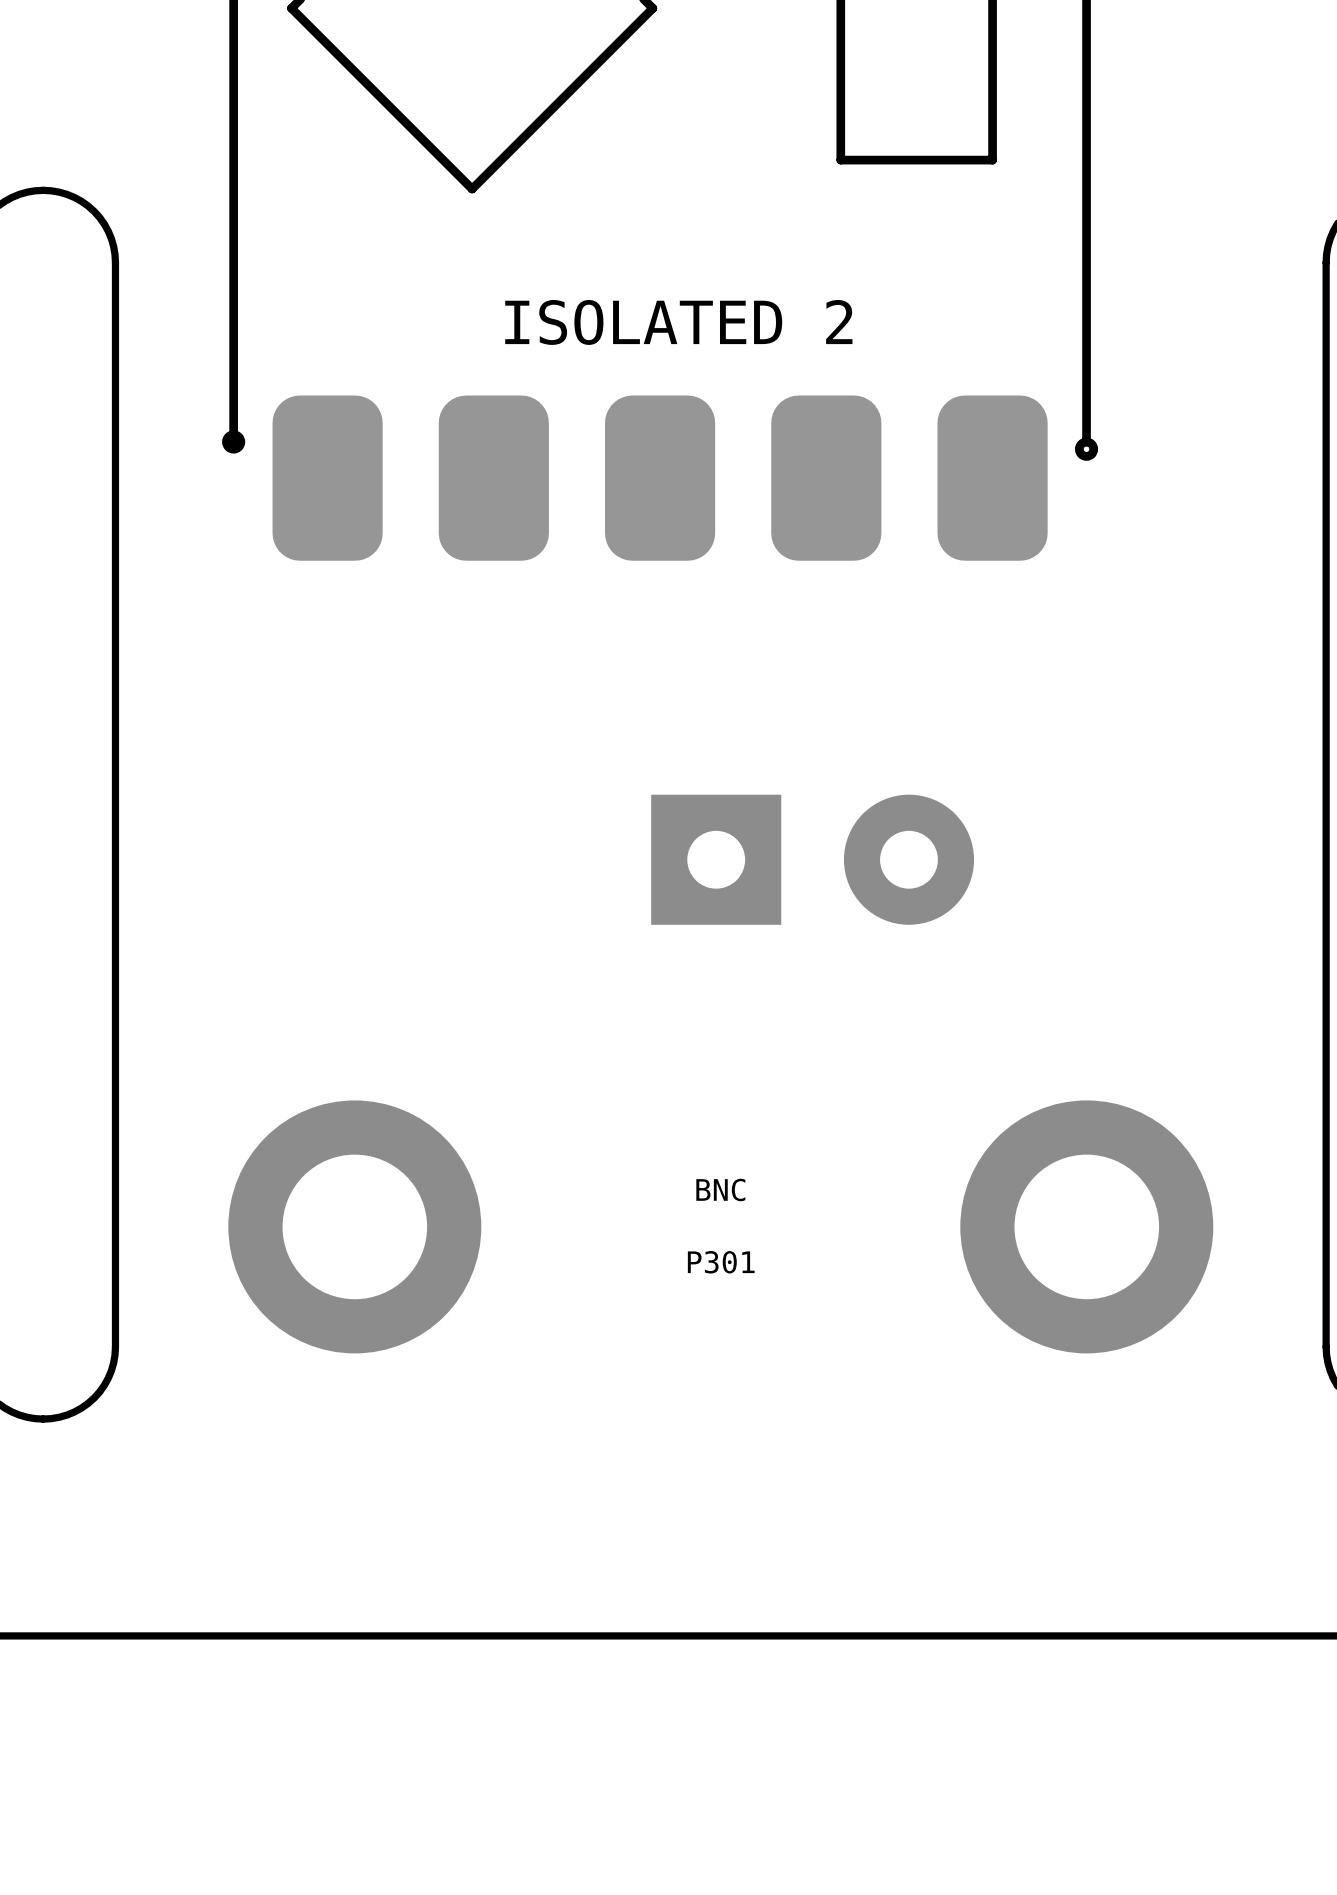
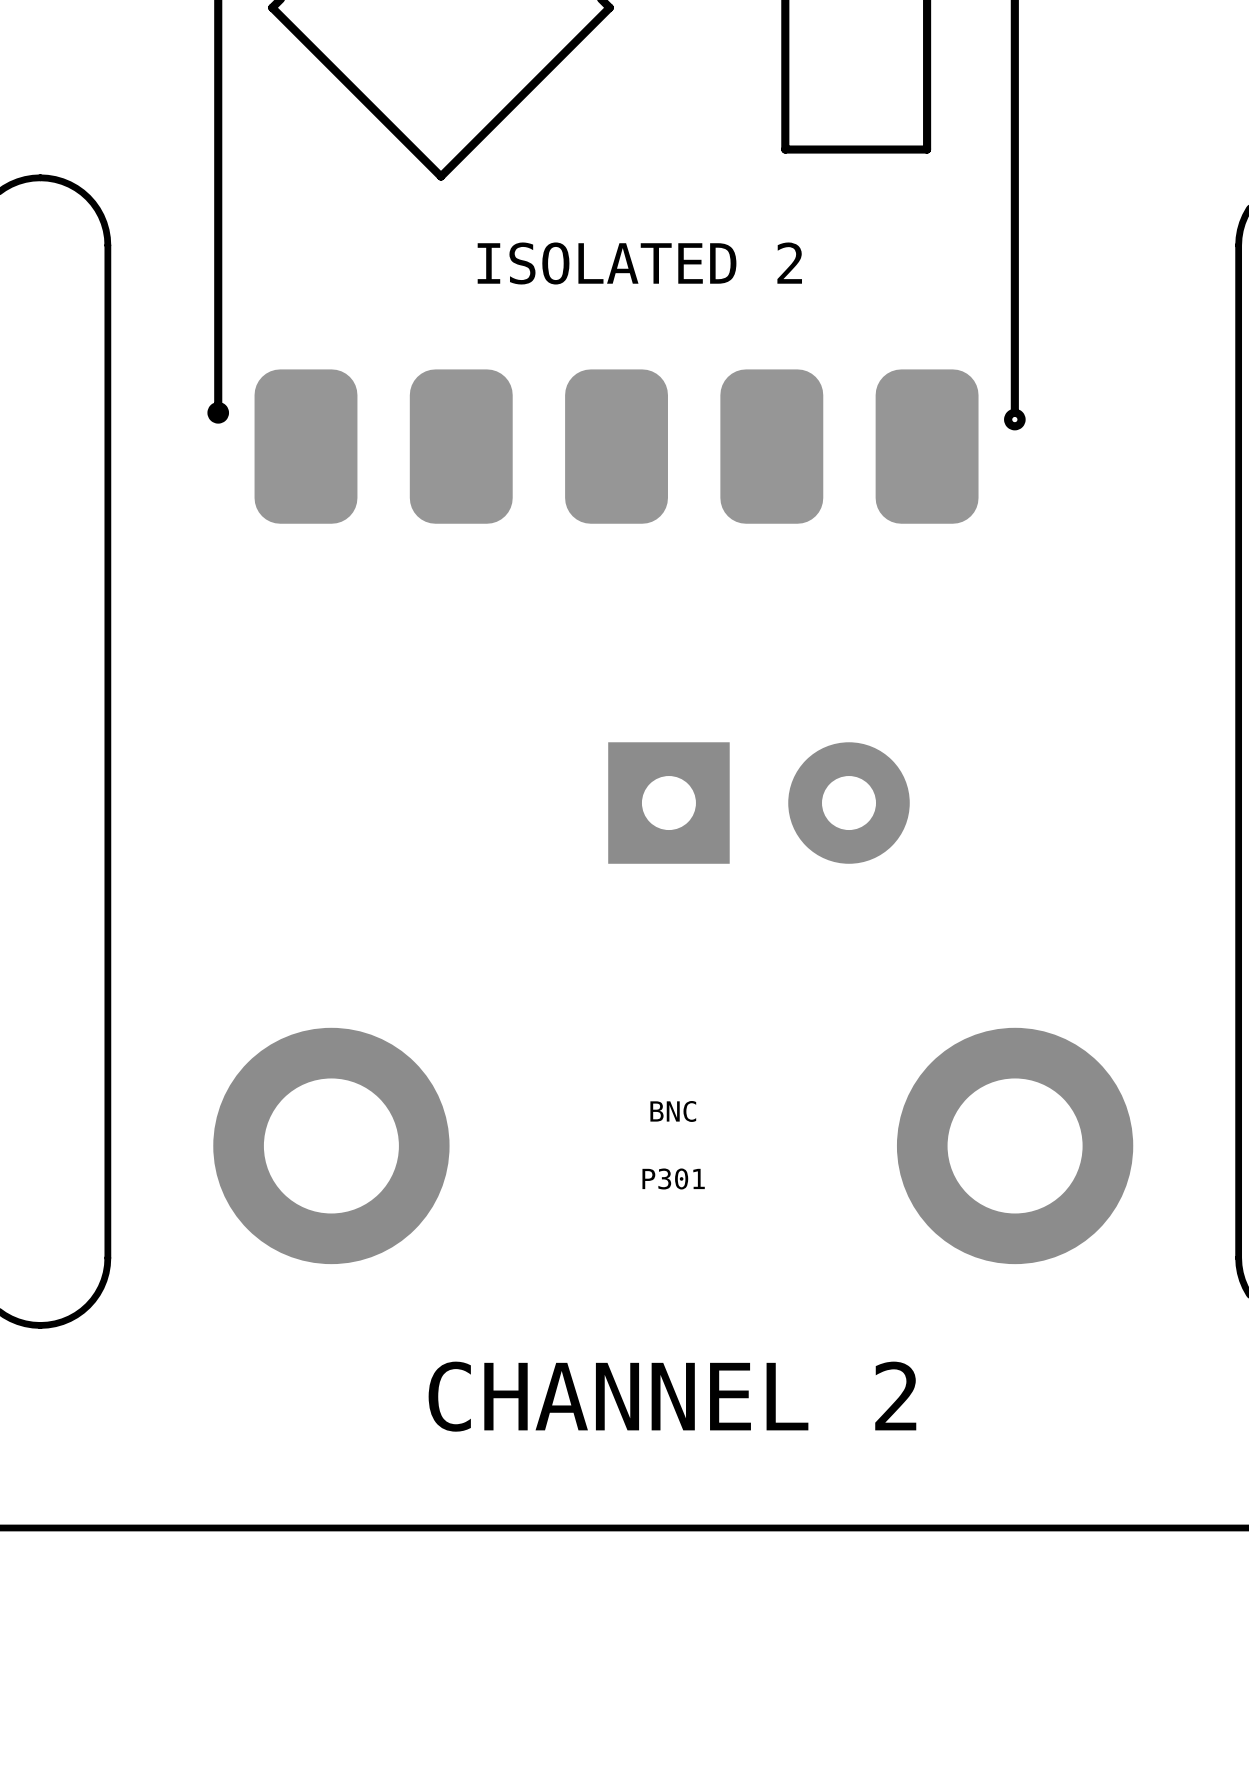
text position: ISOLATED 2 (678, 322) -> ISOLATED 2 (639, 263)
text: none -> CHANNEL 2 (672, 1396)

